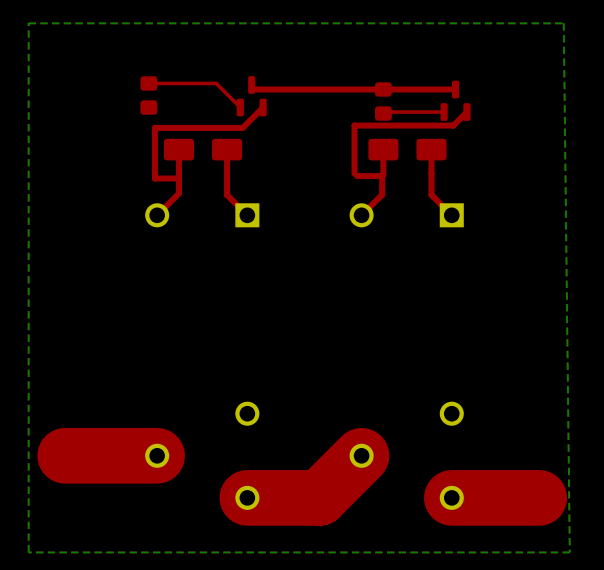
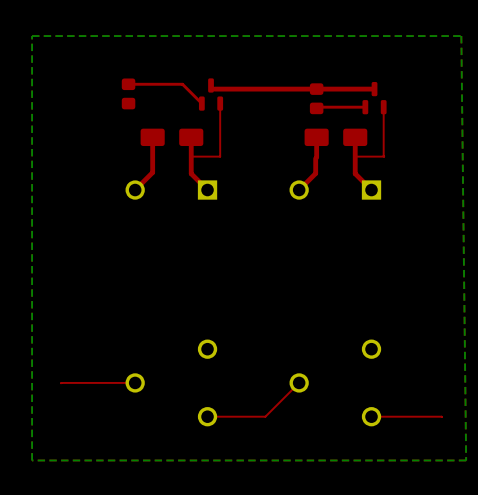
top track: (263, 107) (242, 127) (154, 127) (154, 178) (178, 178) -> (220, 103) (220, 156) (191, 156)
top track: (466, 112) (453, 125) (354, 125) (354, 173) (356, 176) (382, 176) -> (383, 107) (384, 156) (355, 156)
top track width: thick (157, 455) (65, 455) -> thin (135, 382) (61, 382)
top track width: thick (361, 455) (319, 497) (247, 497) -> thin (299, 382) (265, 416) (207, 416)
top track width: thick (539, 497) (451, 497) -> thin (441, 416) (371, 416)

